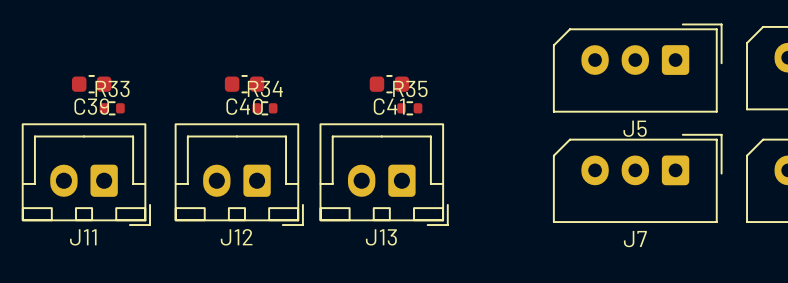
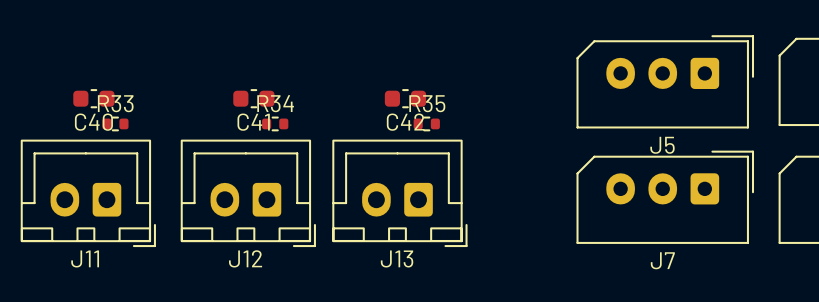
C39 name: C39 (91, 106) -> C40 (93, 122)
C40 name: C40 (244, 106) -> C41 (253, 122)
C41 name: C41 (389, 106) -> C42 (405, 122)

